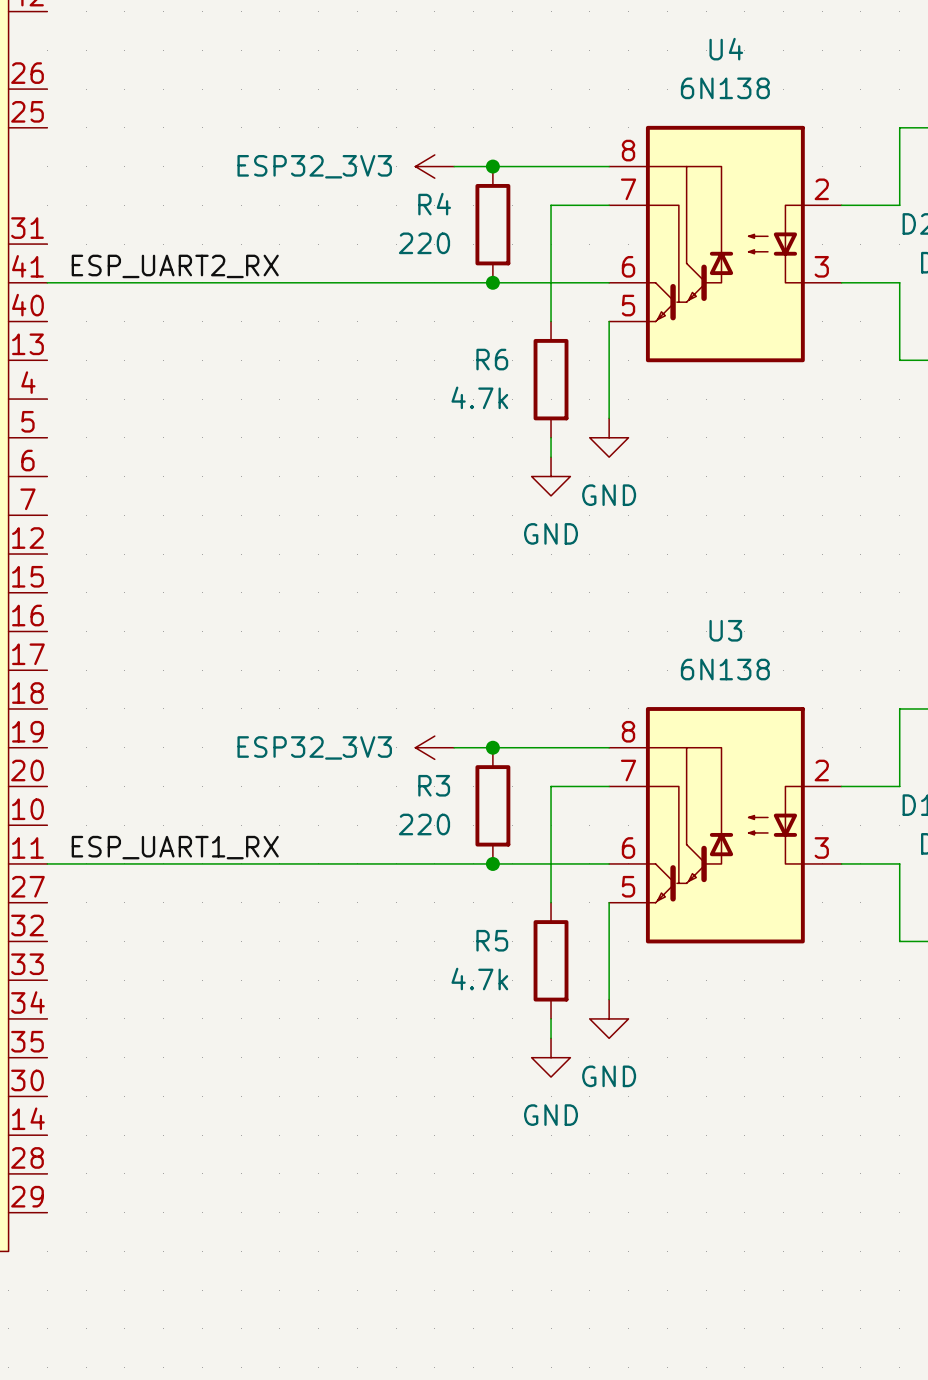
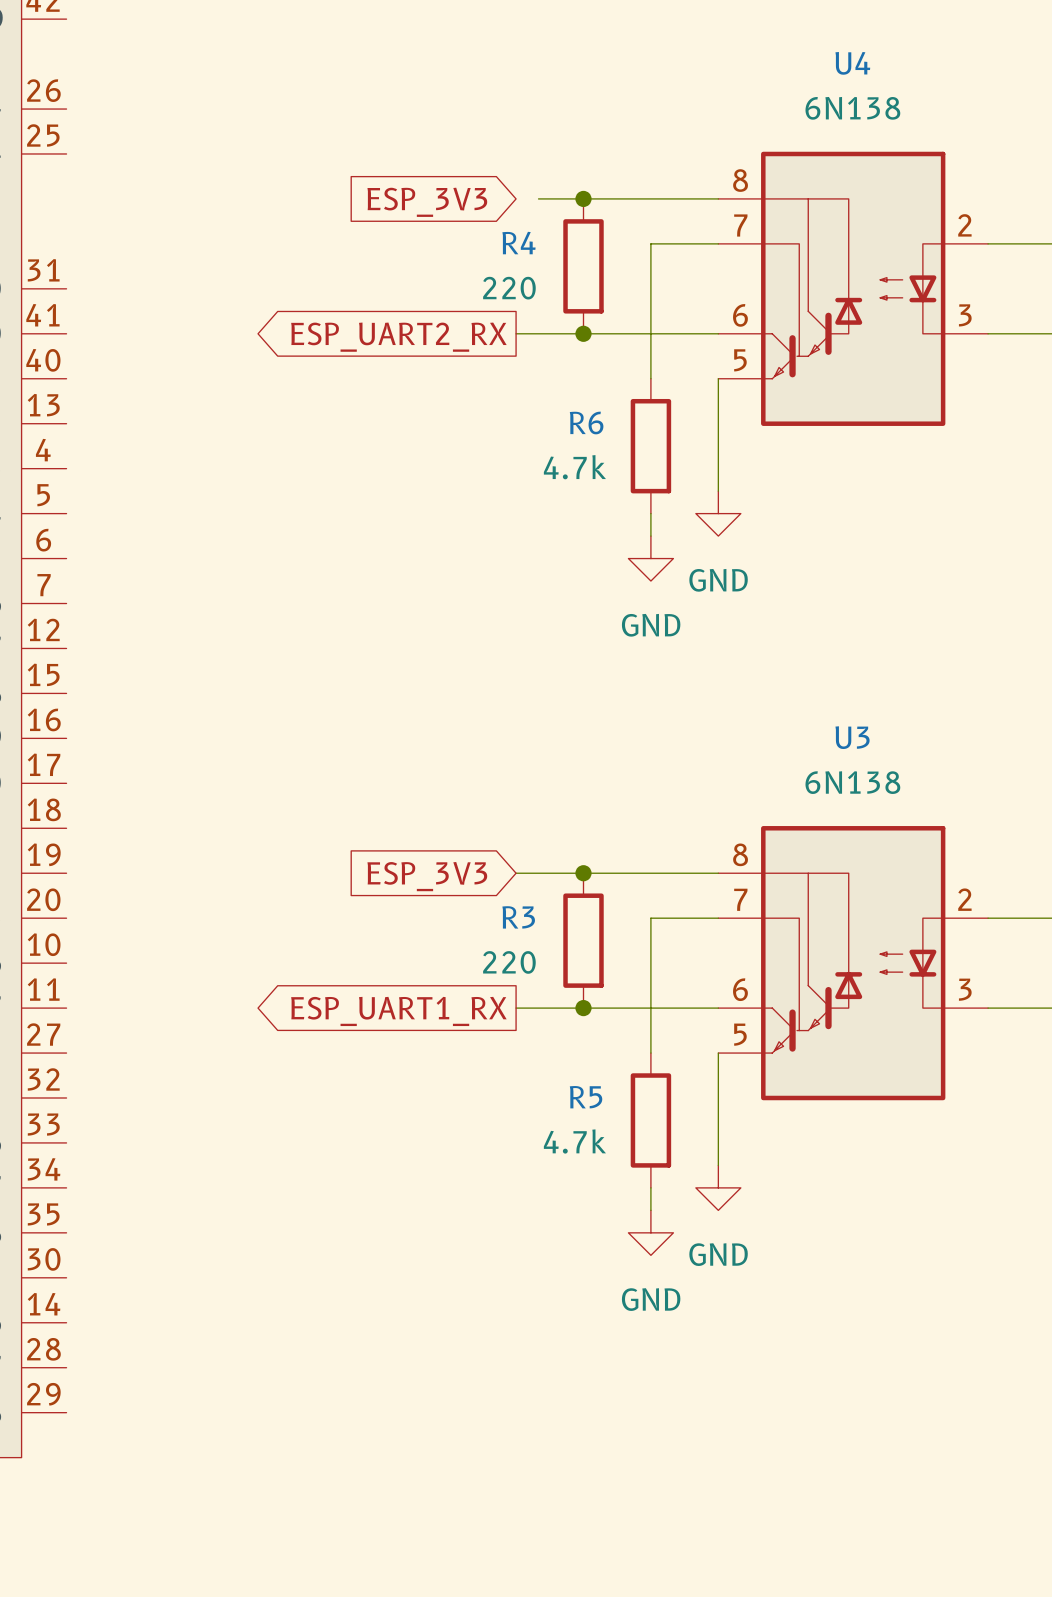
power symbol: ESP32_3V3 (434, 166) -> none
global label: none -> ESP_3V3 (427, 202)
label: ESP_UART2_RX (175, 266) -> none
wire: (47, 282) (434, 282) -> none
global label: none -> ESP_UART2_RX (398, 337)
power symbol: ESP32_3V3 (434, 747) -> none
global label: none -> ESP_3V3 (427, 876)
label: ESP_UART1_RX (175, 847) -> none
wire: (47, 863) (434, 863) -> none
global label: none -> ESP_UART1_RX (398, 1011)

